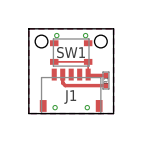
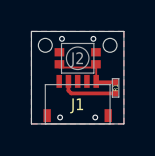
SW1: (71, 52) -> none
J2: none -> (77, 58)

